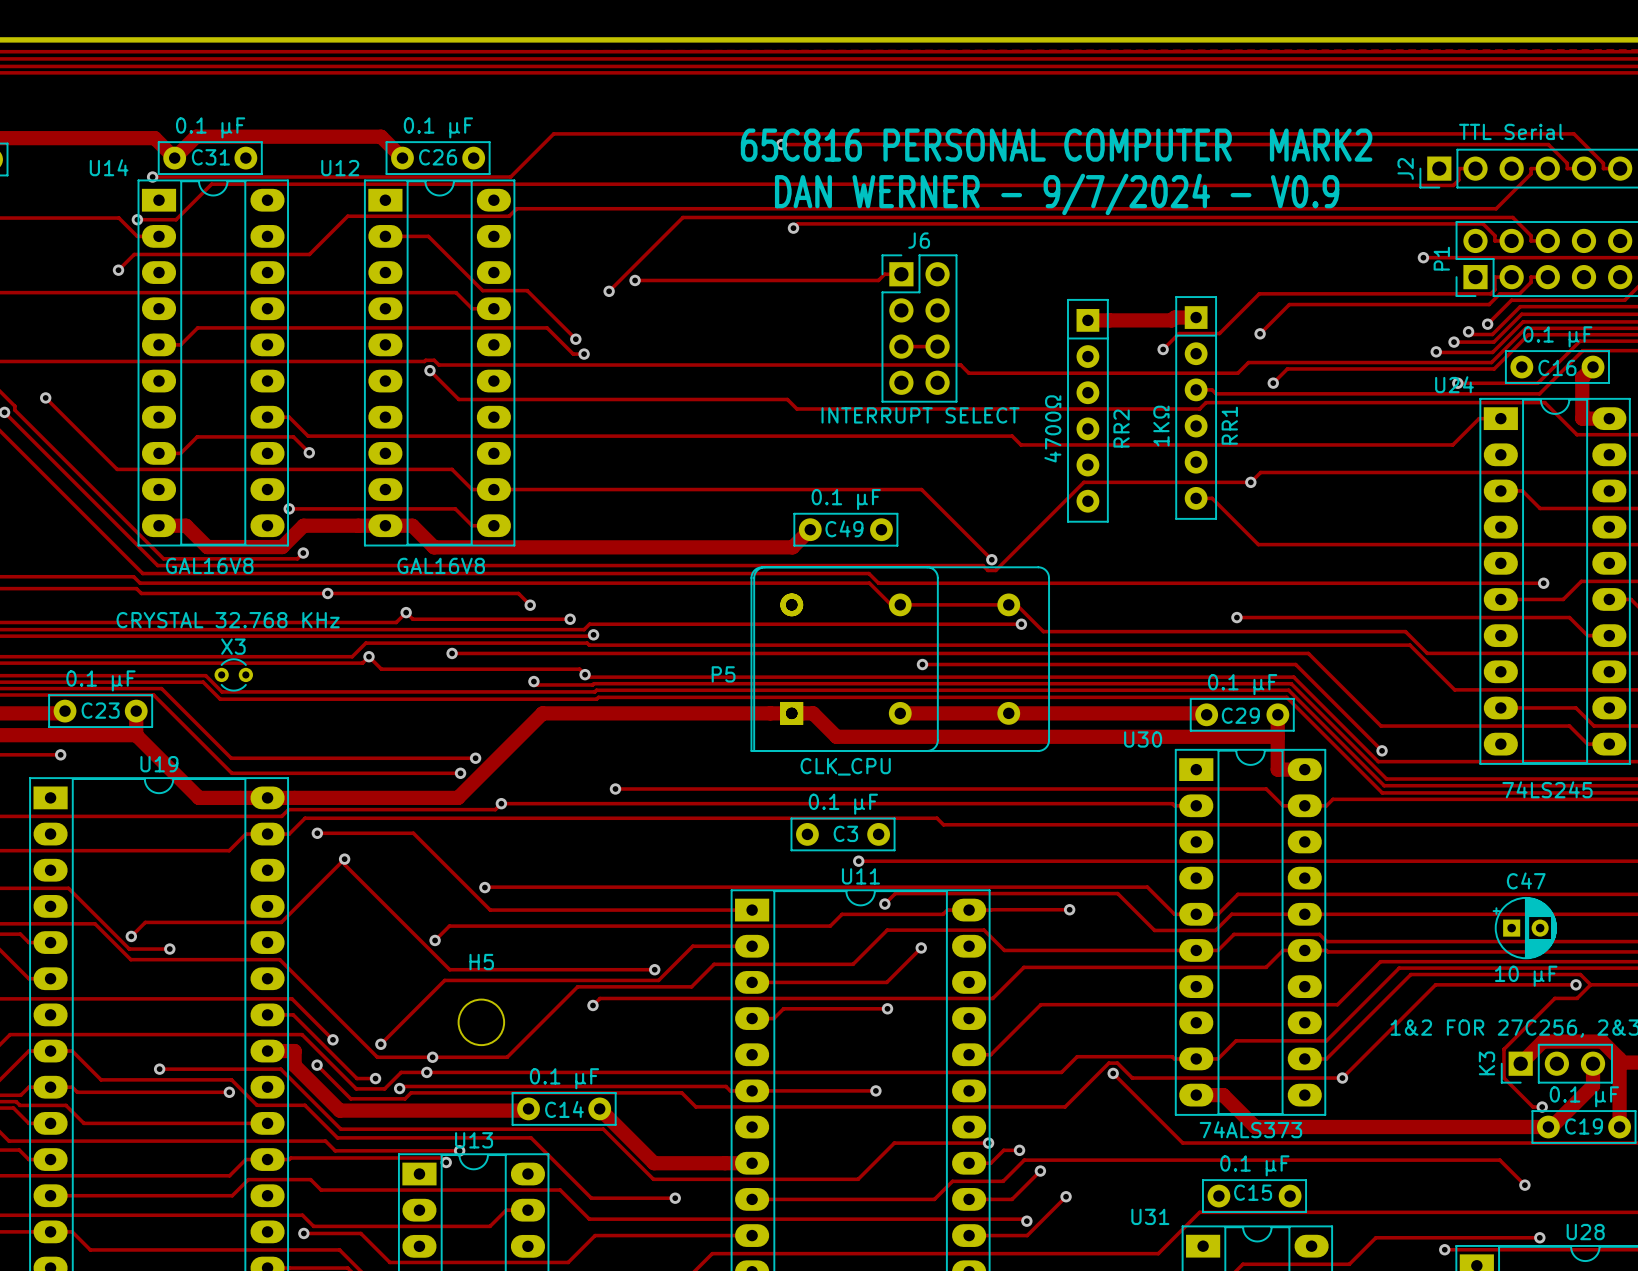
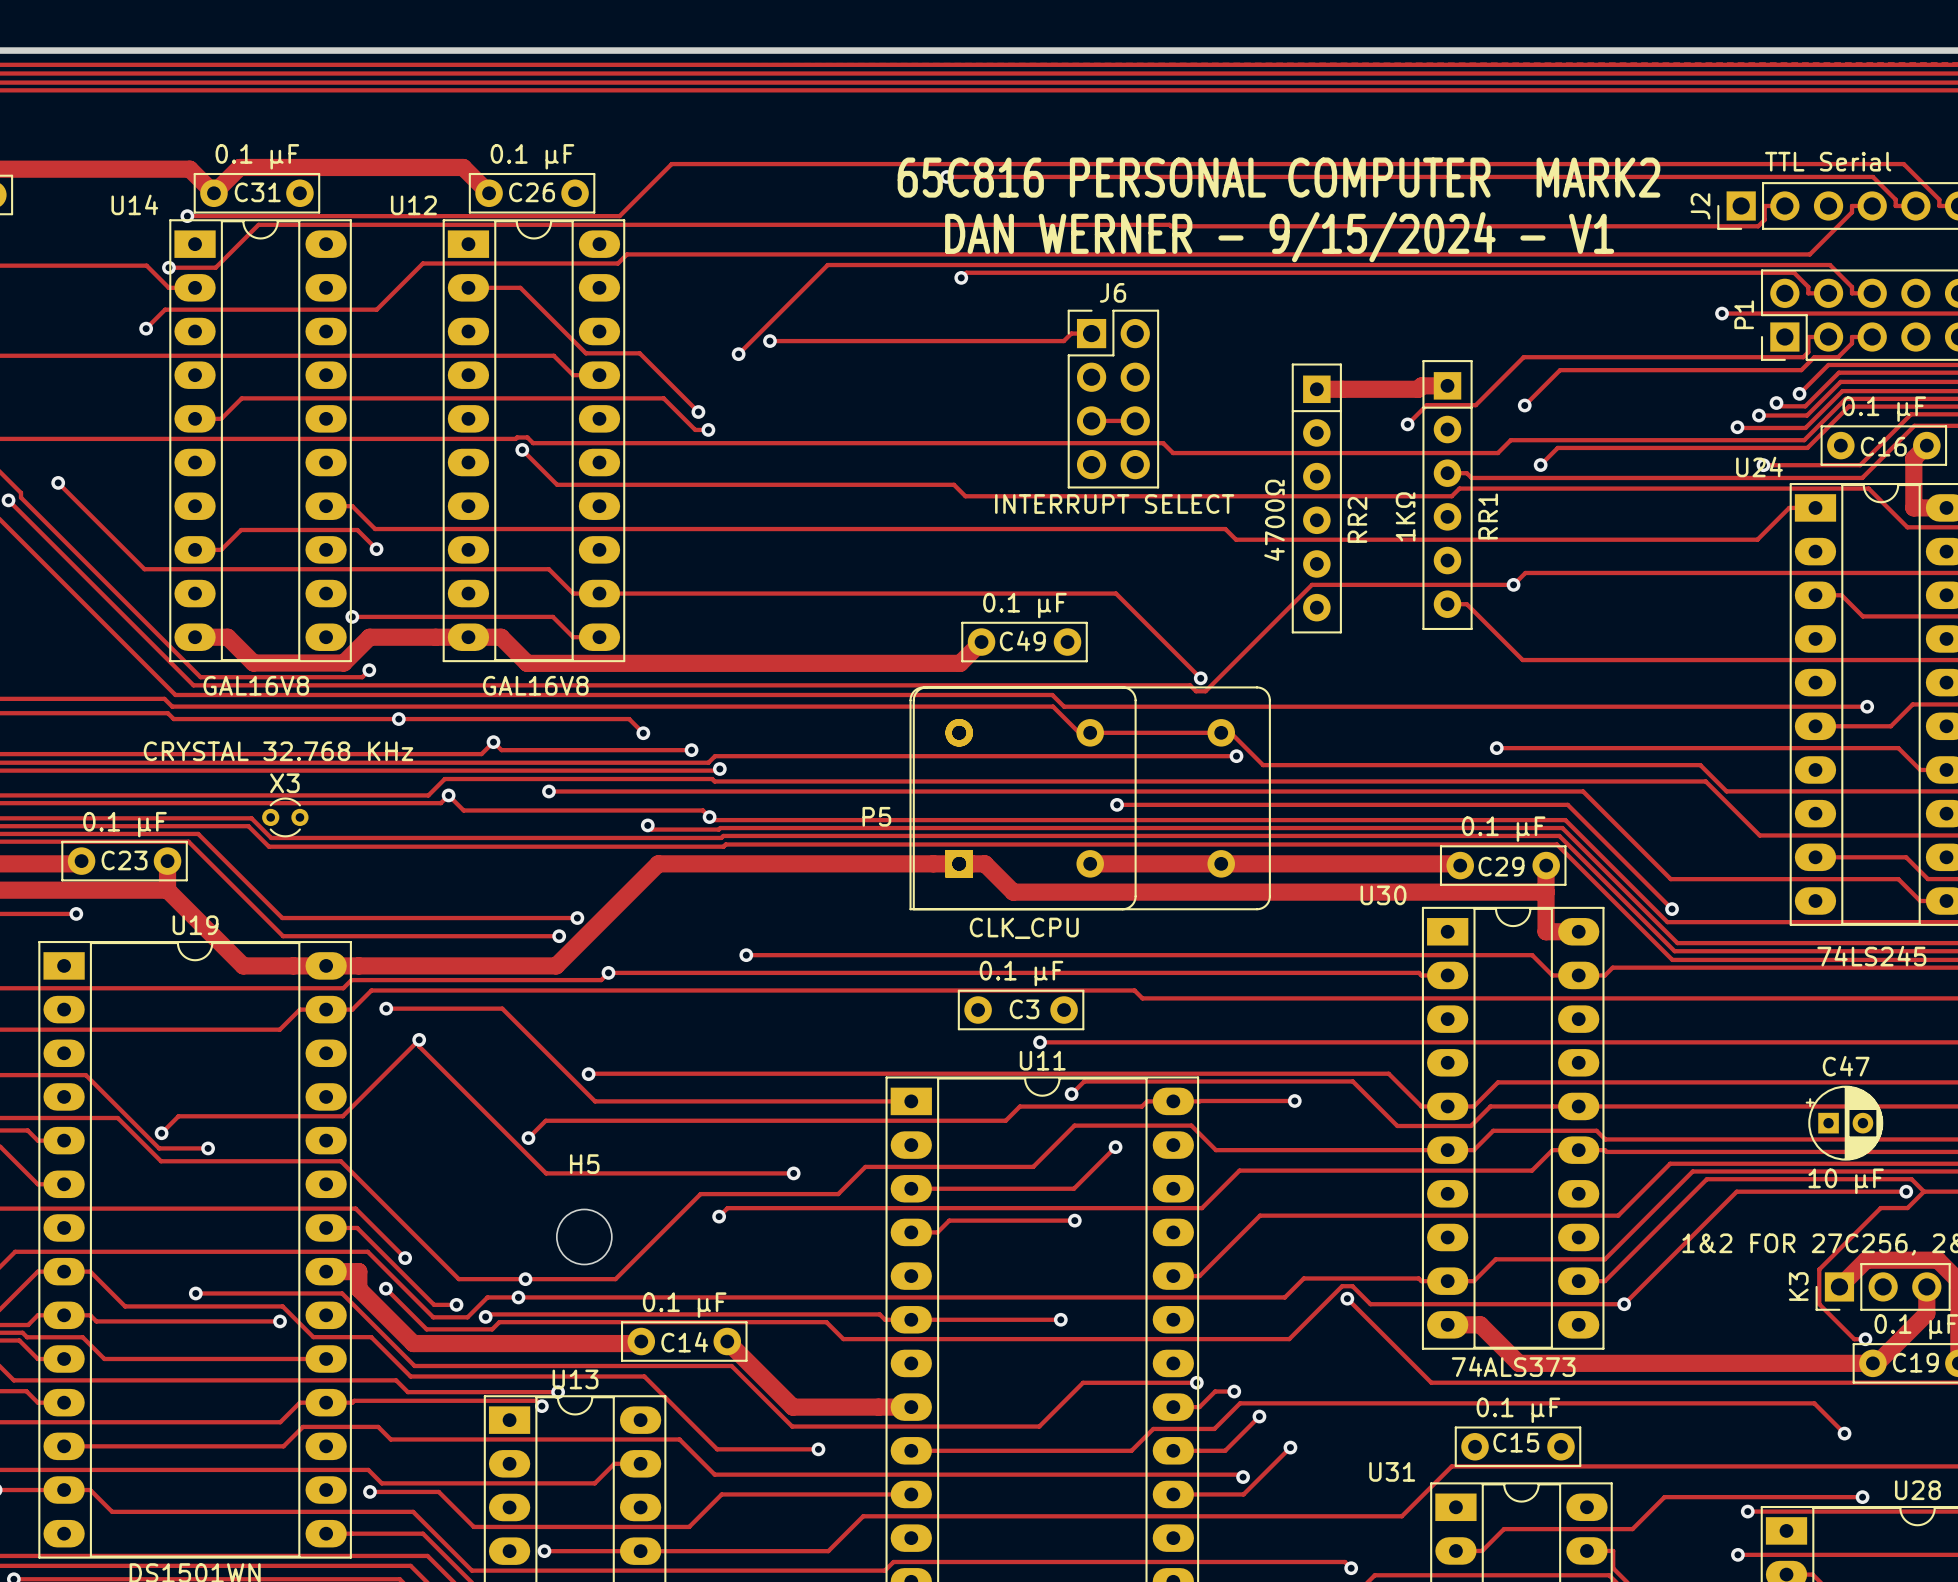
text: DAN WERNER - 9/7/2024 - V0.9 (1057, 194) -> DAN WERNER - 9/15/2024 - V1 (1279, 237)
track: (752, 946) (692, 946) (658, 980) (444, 980) (380, 1044) -> none
via: (380, 1044) -> none

